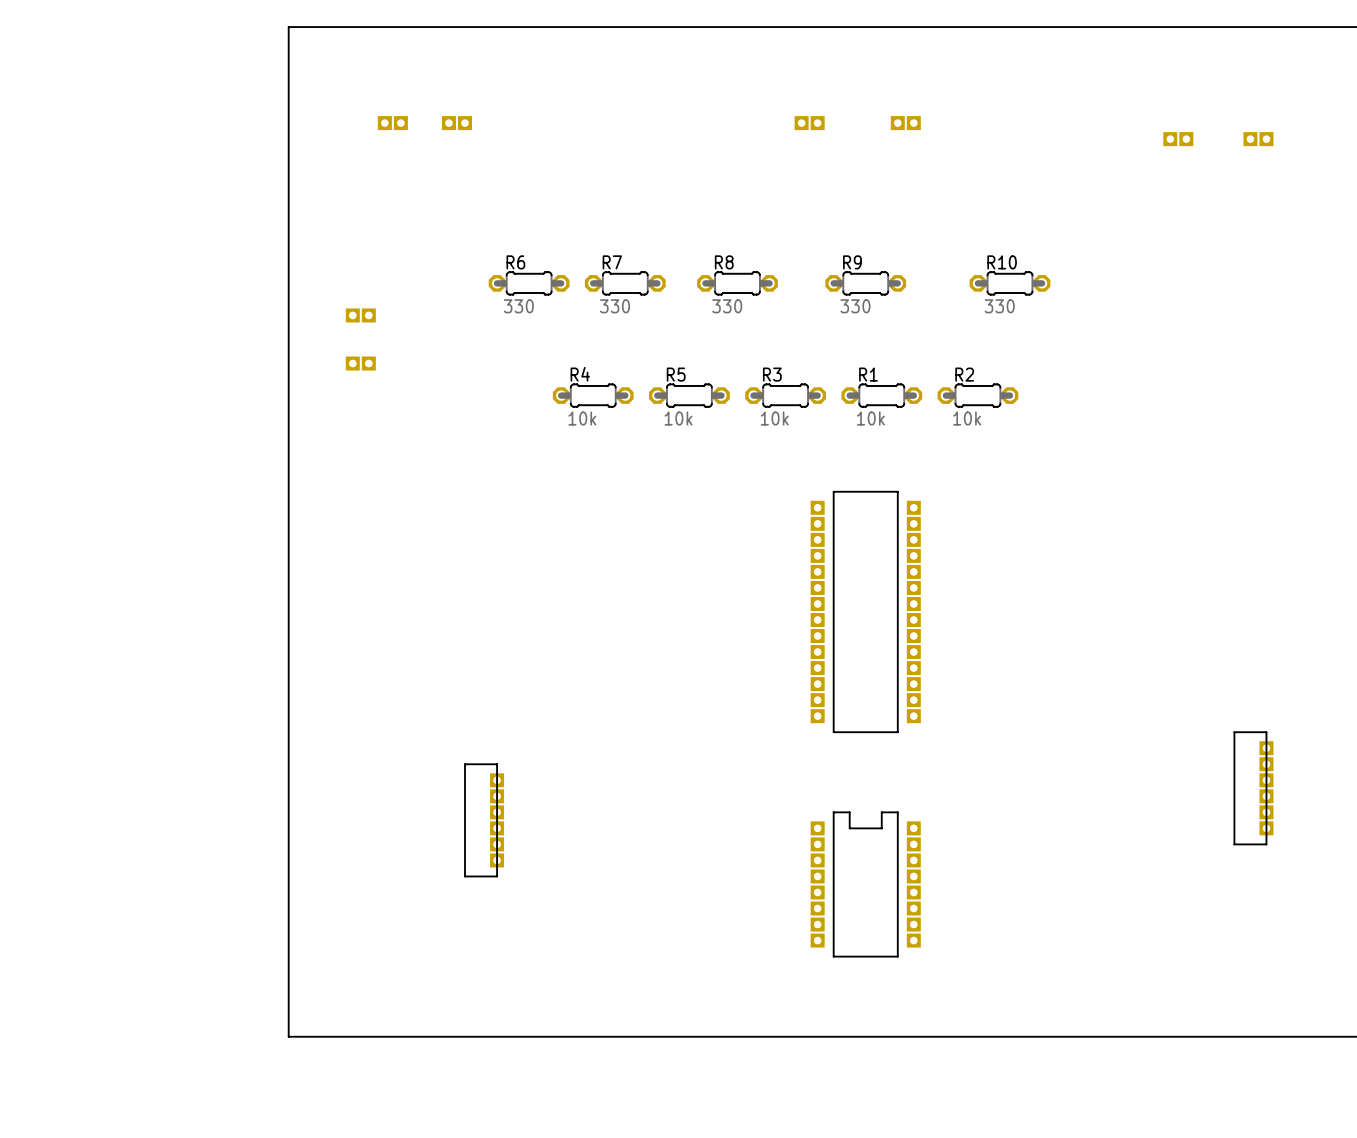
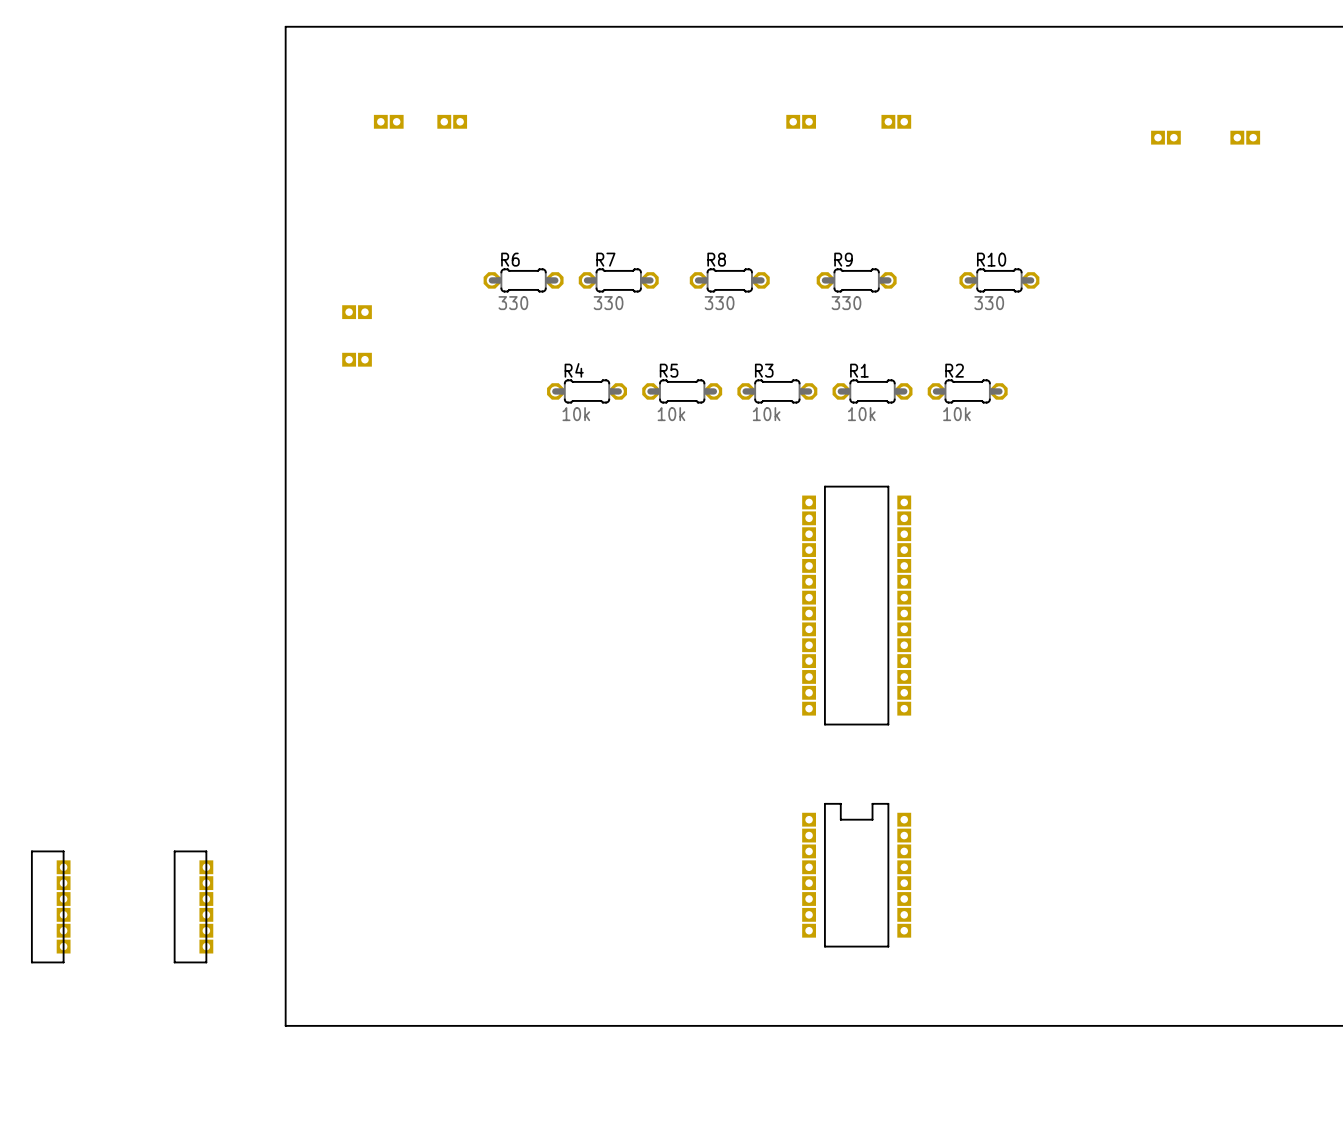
part: (1253, 788) -> none
part: (484, 820) -> none
part: none -> (50, 906)
part: none -> (193, 906)

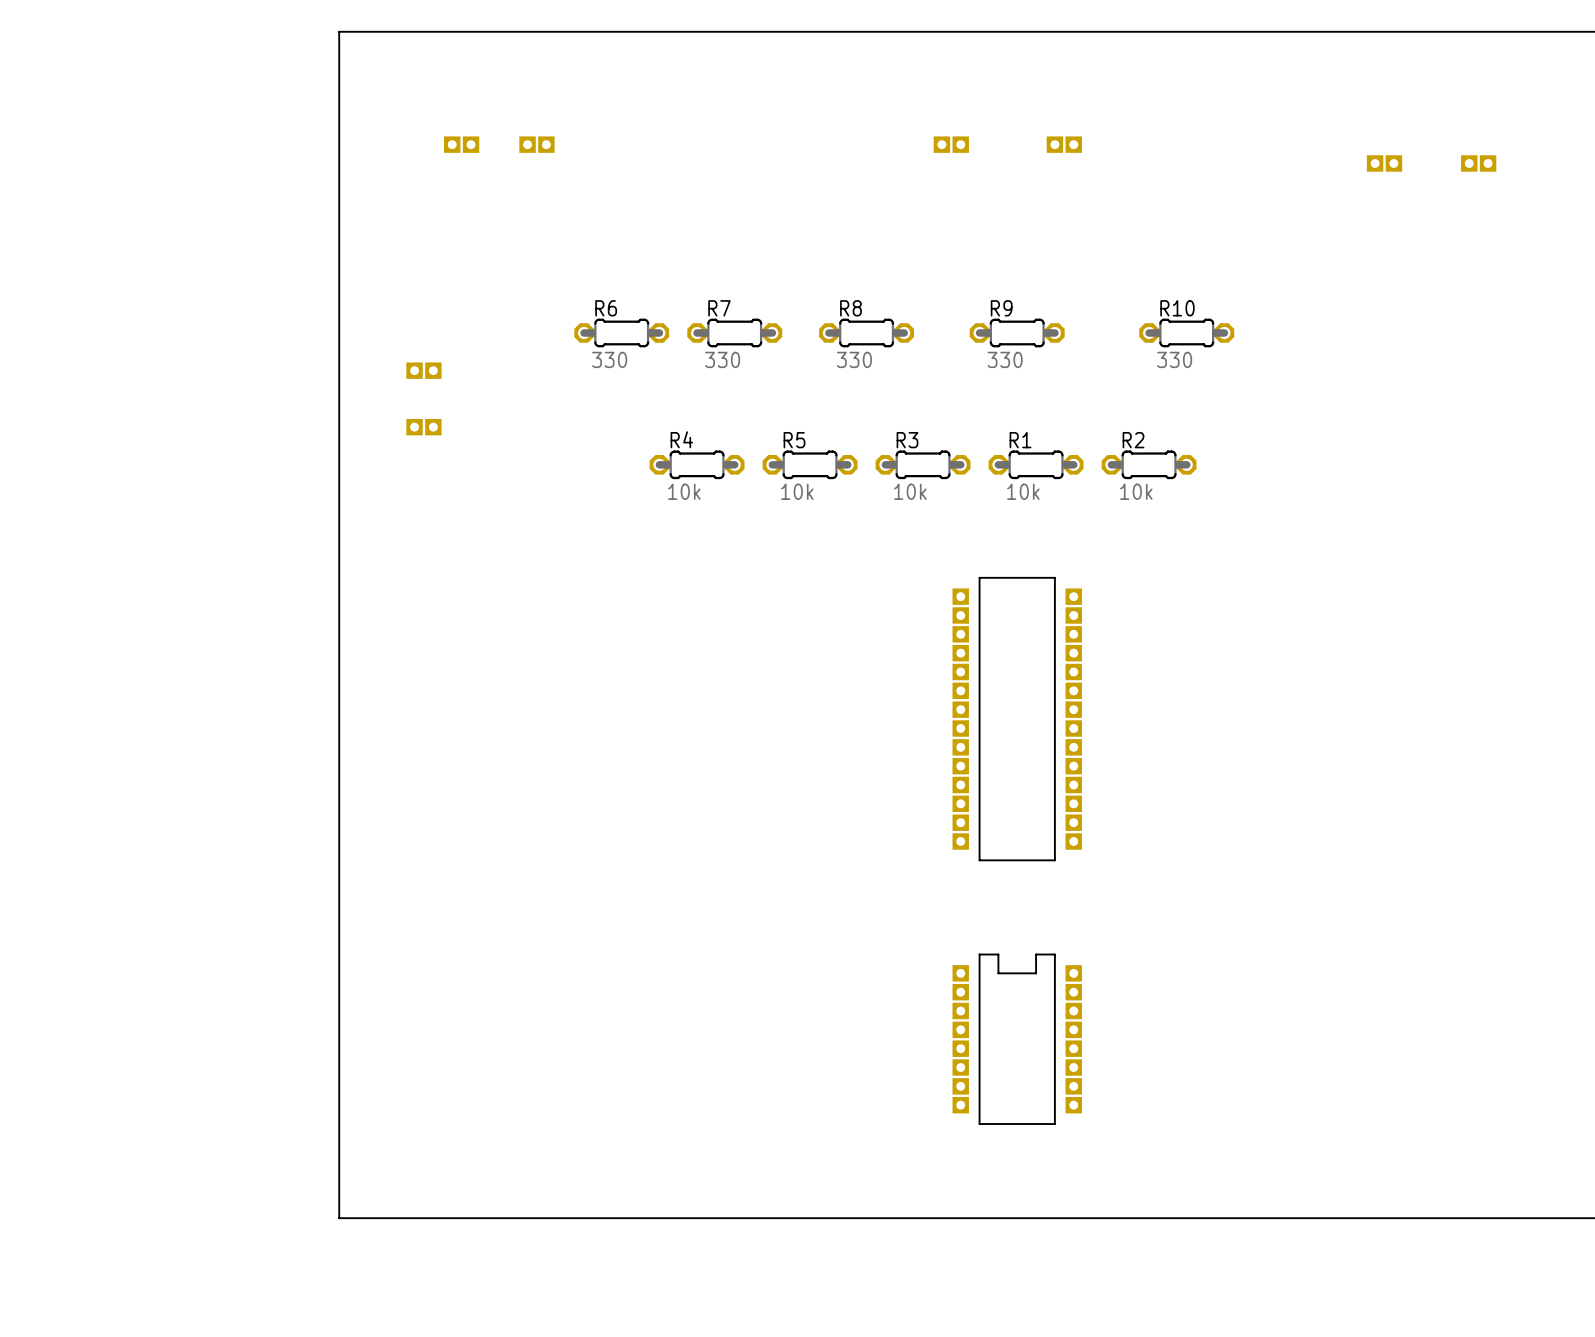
part: (50, 906) -> none
part: (193, 906) -> none

